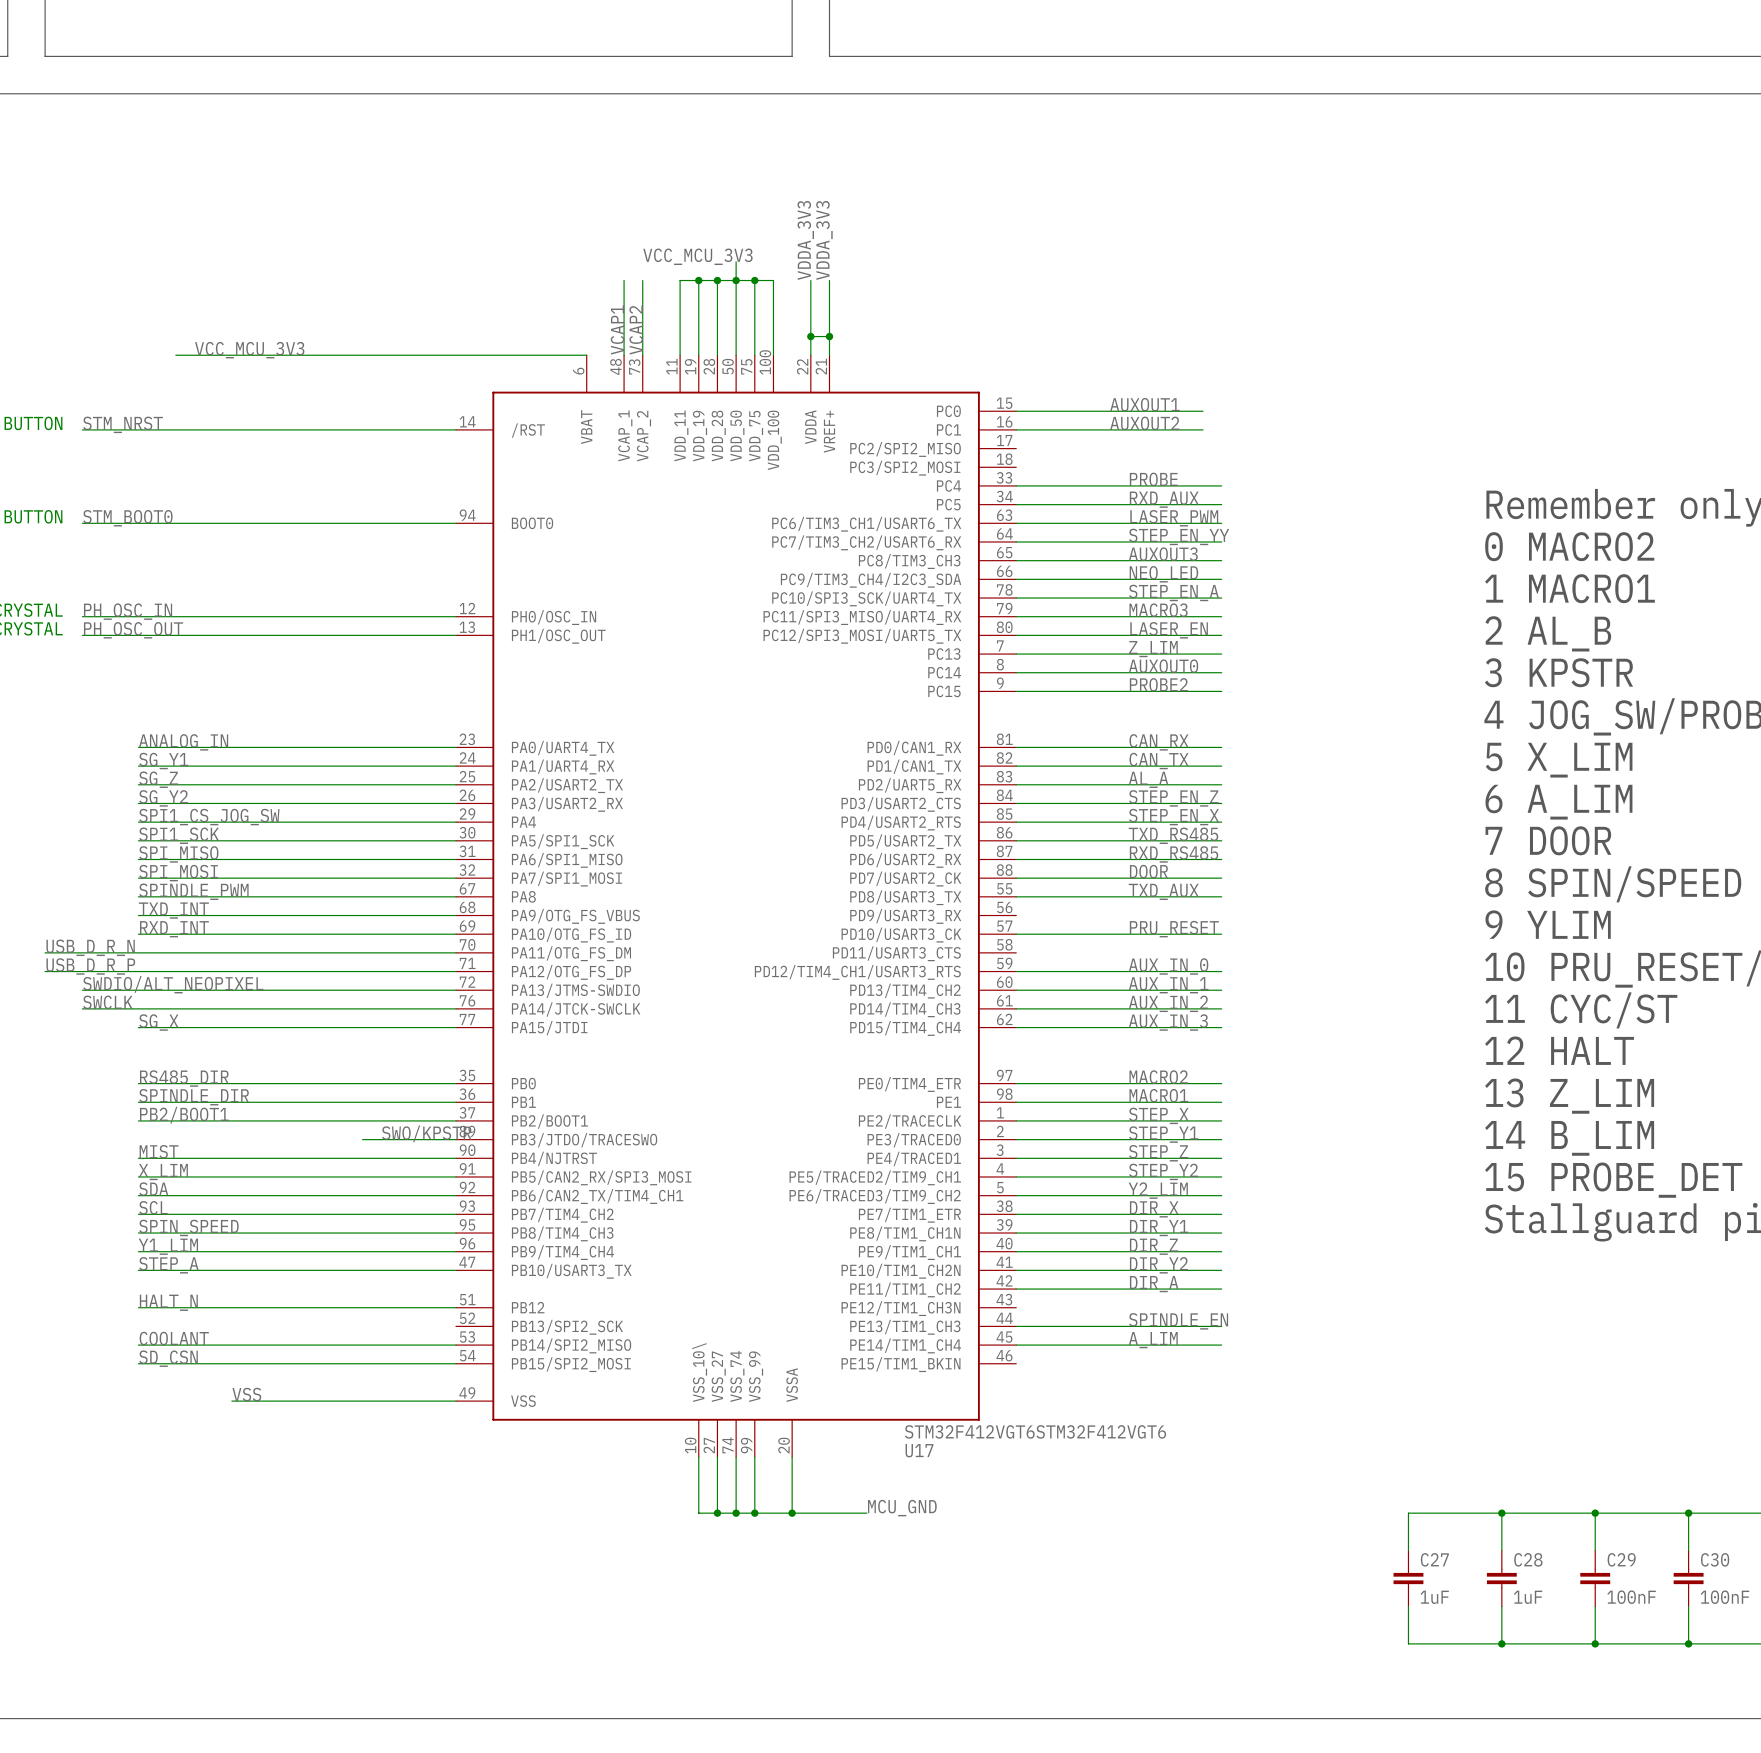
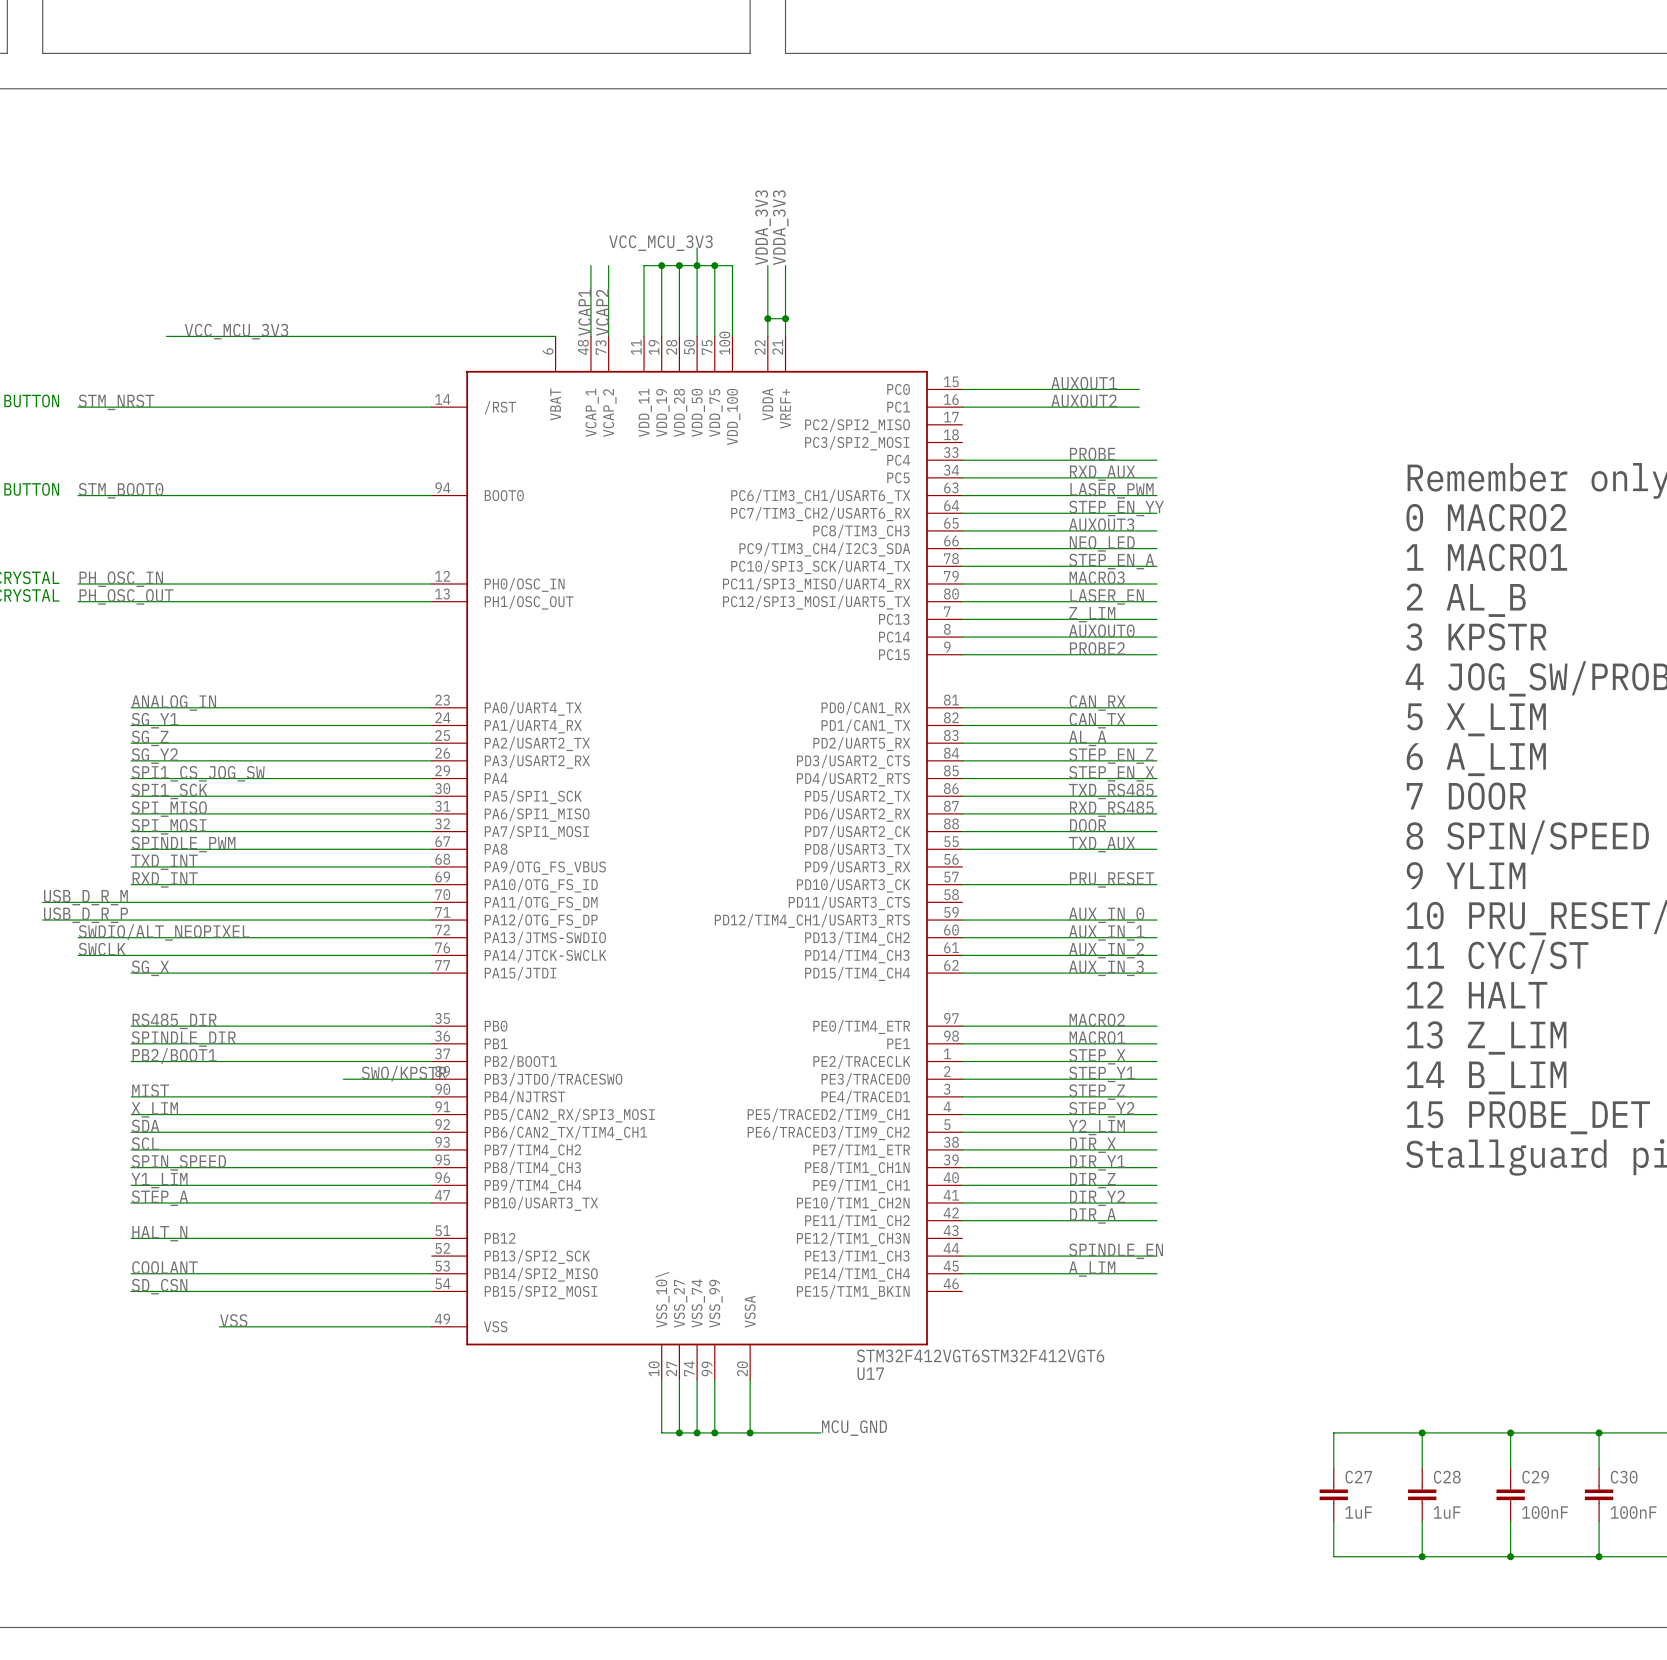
label: USB_D_R_N (90, 947) -> USB_D_R_M (85, 897)

